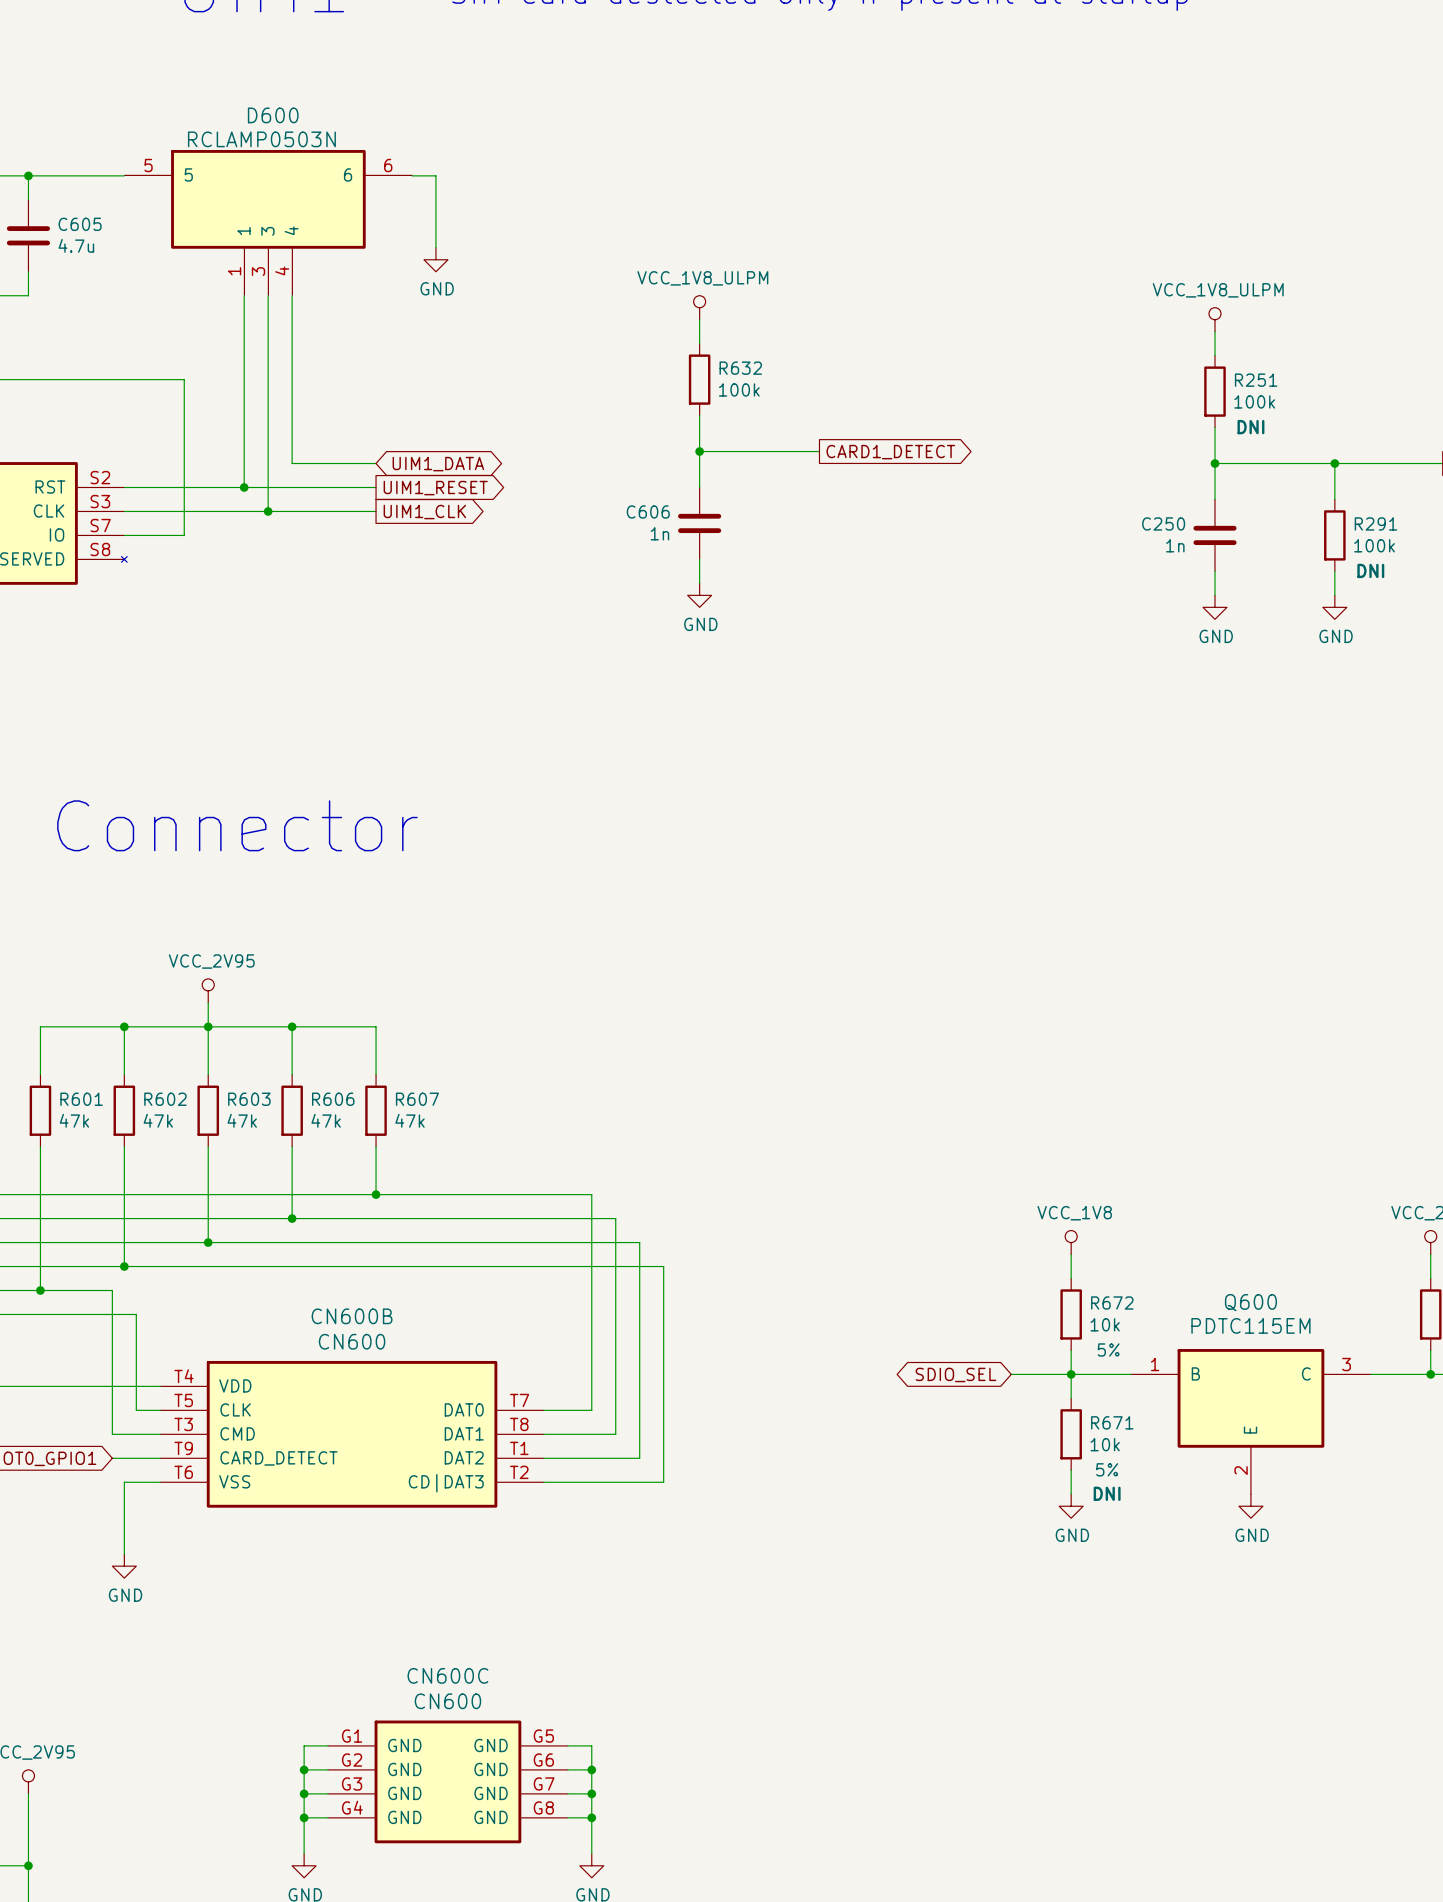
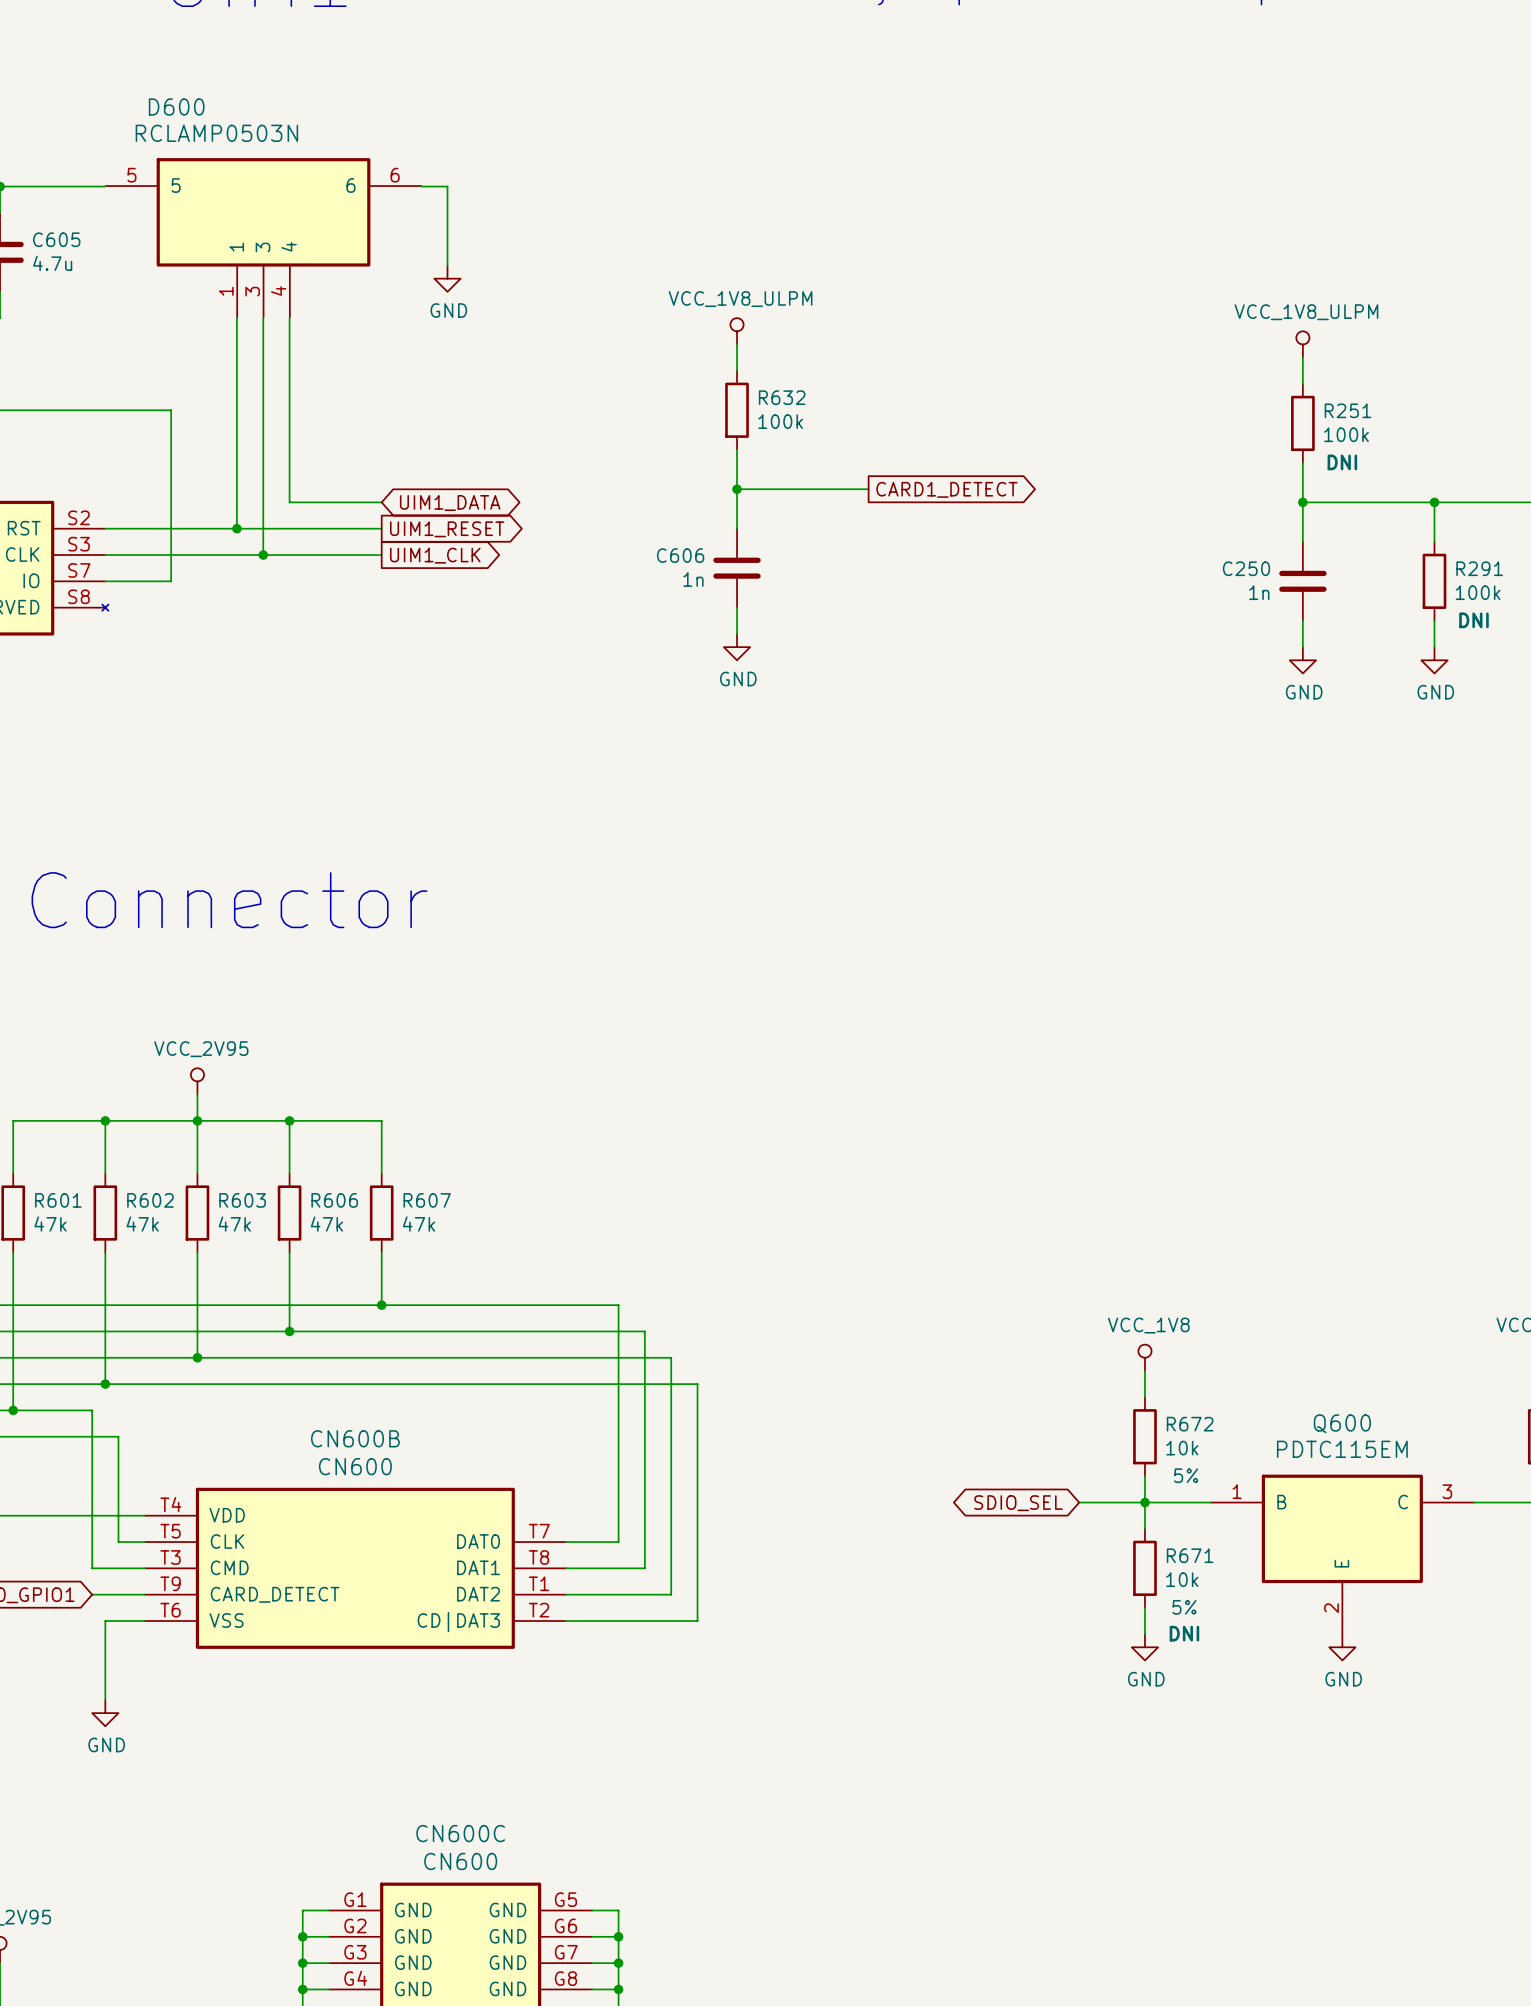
D600 name position: D600 (273, 115) -> D600 (176, 106)
D600 value position: RCLAMP0503N (261, 139) -> RCLAMP0503N (216, 133)

